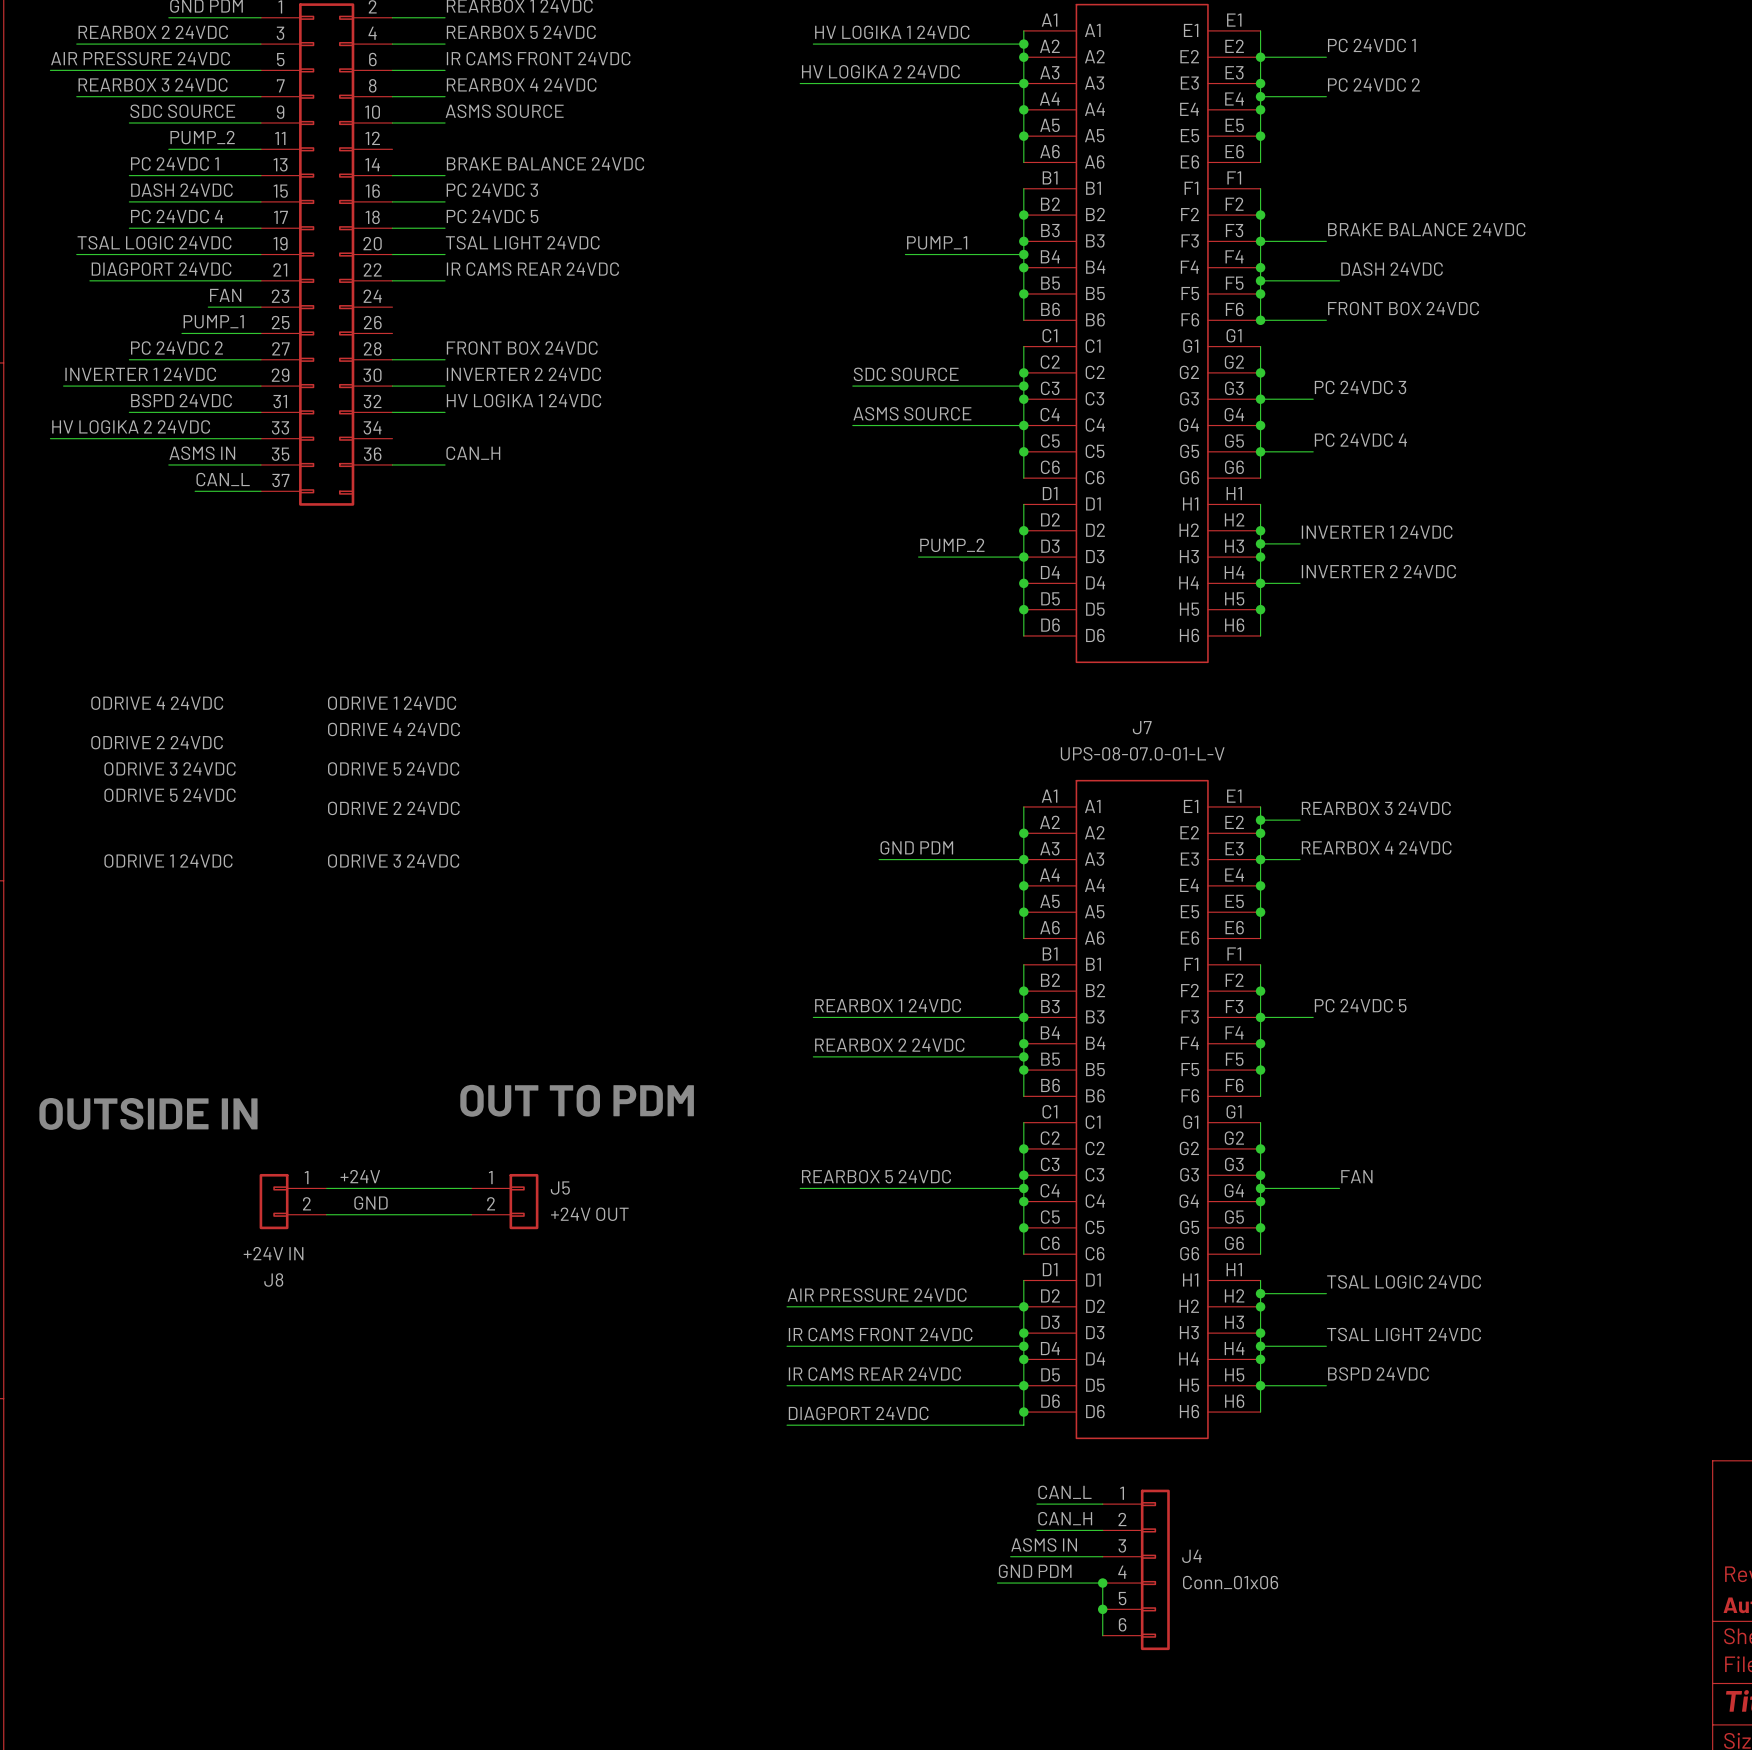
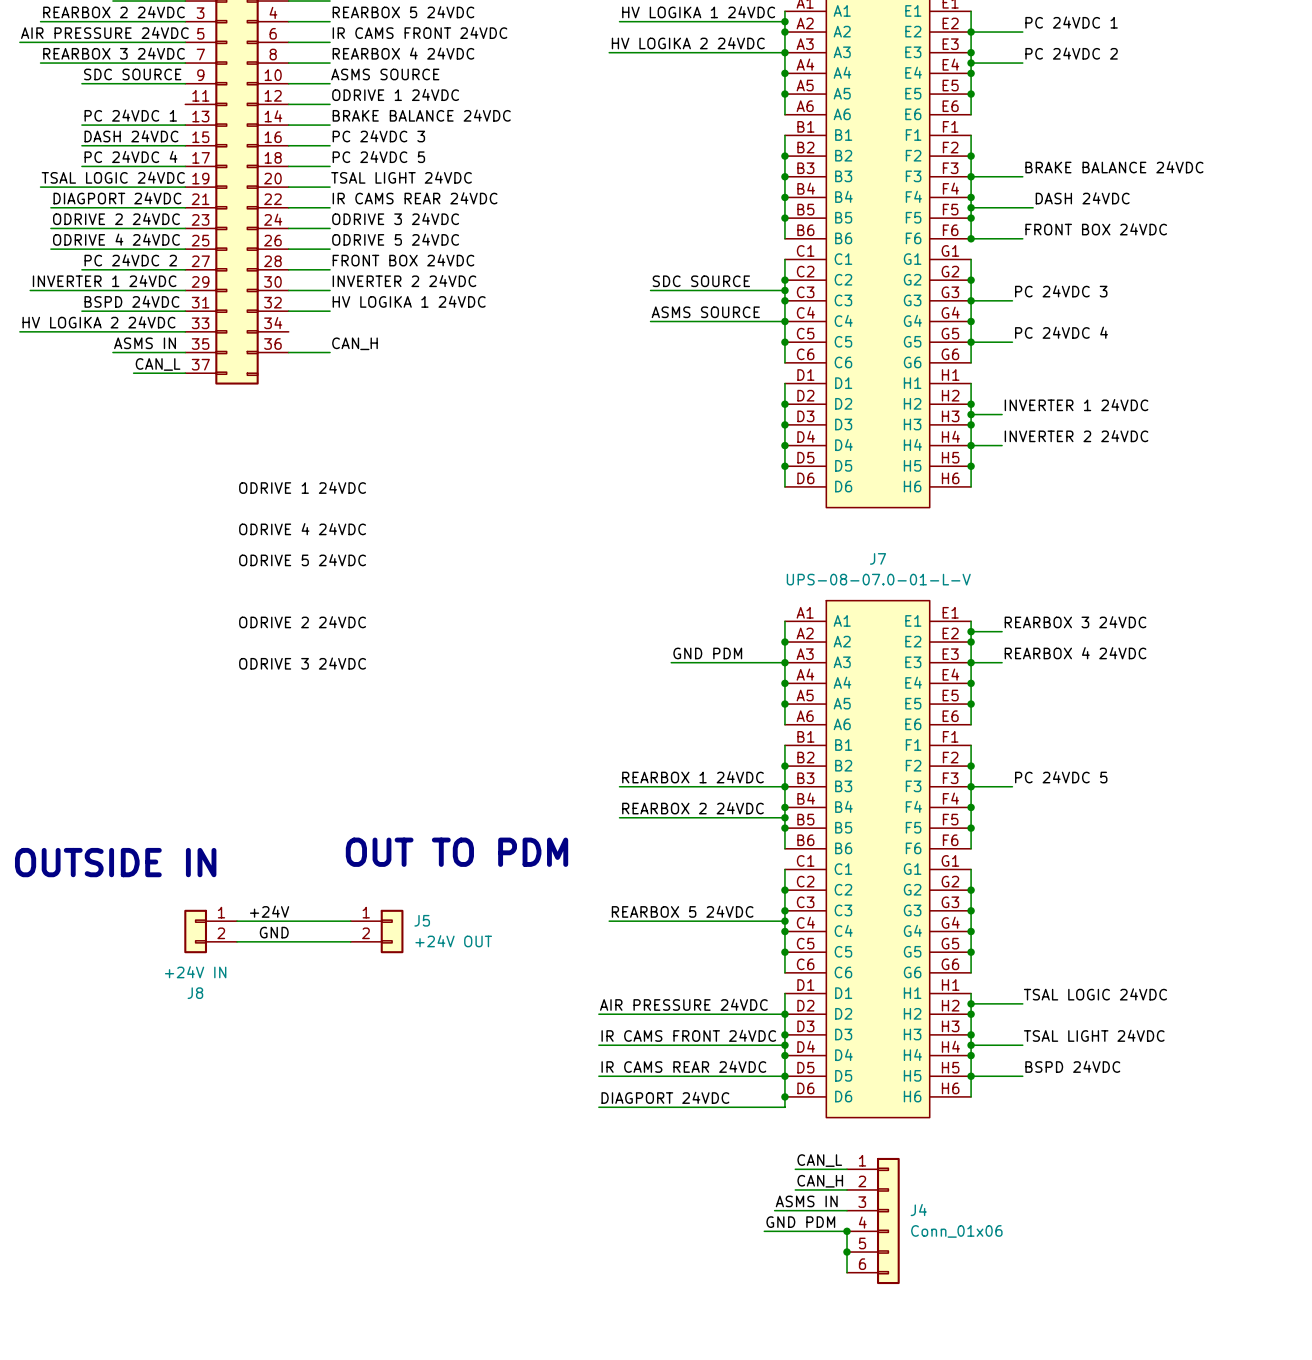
label: PUMP_2 (202, 137) -> none
label: none -> ODRIVE 1 24VDC (395, 94)
wire: (168, 149) (260, 149) -> (50, 249) (123, 249)
wire: none -> (288, 104) (330, 104)
label: PUMP_1 (937, 242) -> none
wire: (905, 254) (1023, 254) -> none
junction: (1023, 254) -> none
label: none -> ODRIVE 2 24VDC (116, 218)
label: FAN (225, 295) -> none
label: none -> ODRIVE 3 24VDC (395, 218)
wire: none -> (50, 228) (143, 228)
wire: none -> (288, 228) (330, 228)
label: none -> ODRIVE 4 24VDC (116, 239)
label: PUMP_1 (213, 321) -> none
label: none -> ODRIVE 5 24VDC (395, 239)
wire: none -> (288, 249) (330, 249)
label: PUMP_2 (952, 545) -> none
wire: (918, 557) (1023, 557) -> none
label: none -> ODRIVE 4 24VDC (302, 529)
label: ODRIVE 4 24VDC (157, 703) -> none
label position: ODRIVE 1 24VDC (392, 703) -> ODRIVE 1 24VDC (302, 487)
label: ODRIVE 4 24VDC (393, 729) -> ODRIVE 5 24VDC (302, 560)
label: ODRIVE 2 24VDC (157, 742) -> none
label: ODRIVE 3 24VDC (170, 768) -> none
label: ODRIVE 5 24VDC (393, 768) -> none
label: ODRIVE 5 24VDC (170, 795) -> none
label: ODRIVE 1 24VDC (168, 861) -> none
label: FAN (1356, 1176) -> none
wire: (1260, 1188) (1339, 1188) -> none
junction: (1260, 1188) -> none

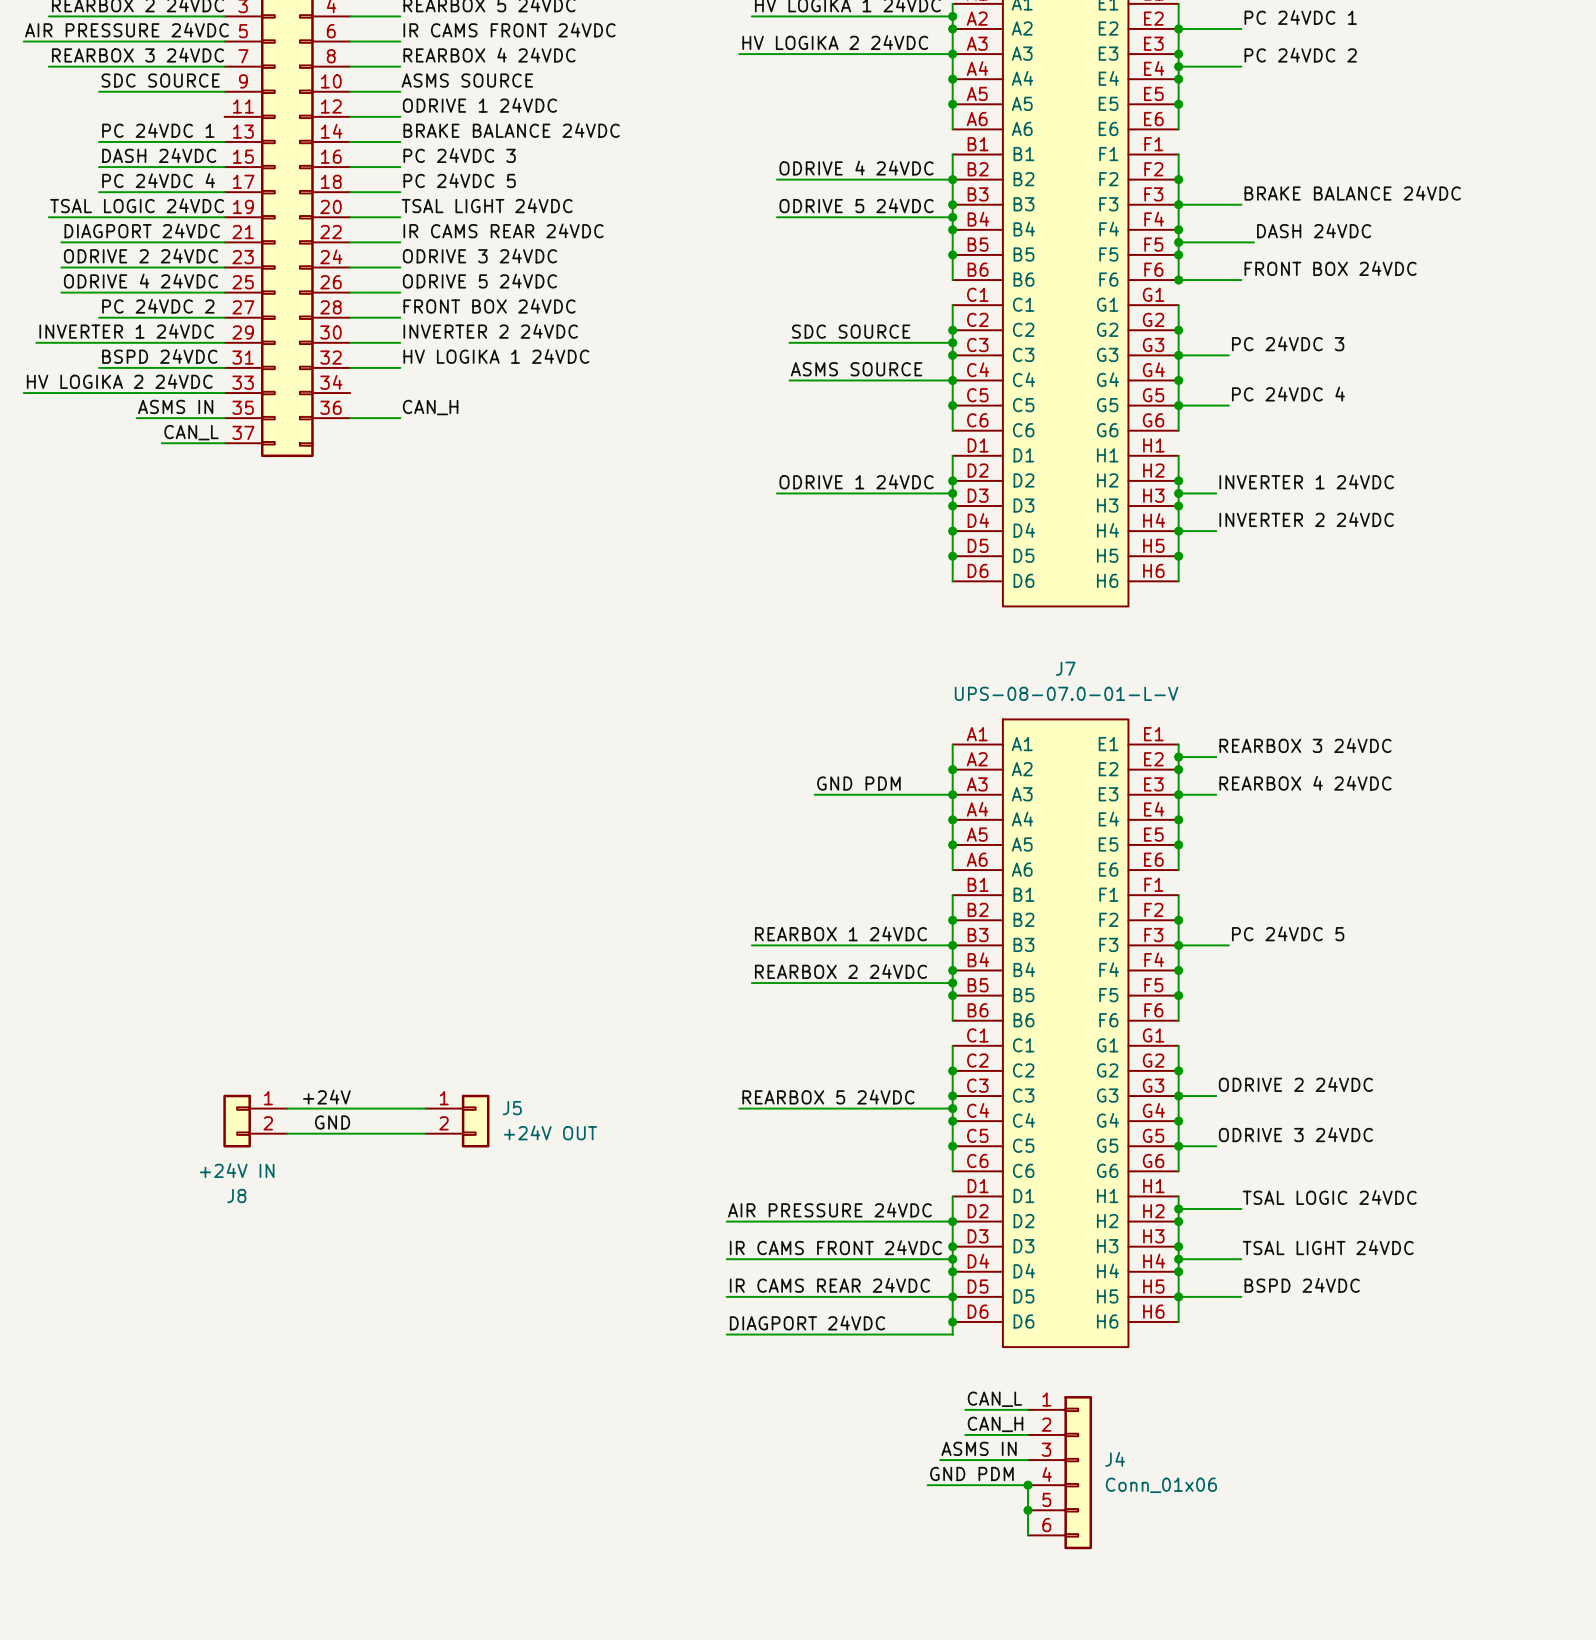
label: none -> ODRIVE 4 24VDC (856, 168)
wire: none -> (776, 179) (952, 179)
label: none -> ODRIVE 5 24VDC (856, 205)
wire: none -> (776, 217) (952, 217)
junction: none -> (952, 217)
label: none -> ODRIVE 1 24VDC (856, 481)
wire: none -> (776, 493) (952, 493)
junction: none -> (952, 493)
label: ODRIVE 1 24VDC (302, 487) -> none
label: ODRIVE 4 24VDC (302, 529) -> none
label: ODRIVE 5 24VDC (302, 560) -> none
label: ODRIVE 2 24VDC (302, 622) -> none
label: ODRIVE 3 24VDC (302, 663) -> none
text: OUT TO PDM (457, 852) -> none
text: OUTSIDE IN (115, 862) -> none
label: none -> ODRIVE 2 24VDC (1295, 1084)
wire: none -> (1178, 1096) (1216, 1096)
label: none -> ODRIVE 3 24VDC (1295, 1134)
wire: none -> (1178, 1146) (1216, 1146)

